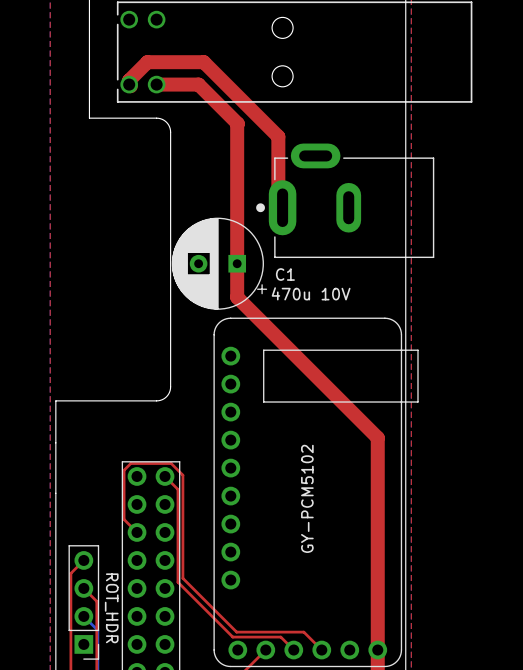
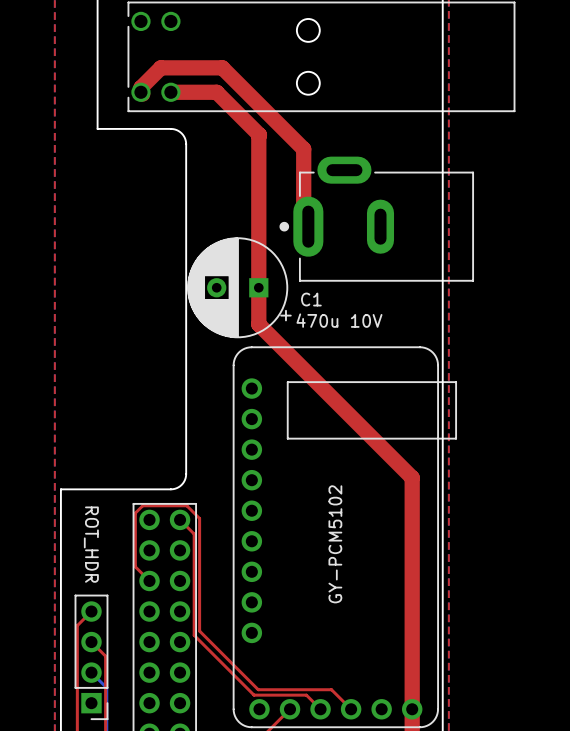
board edge: (170, 386) (166, 396) (158, 400) (55, 400) (55, 448) -> (186, 422) (186, 476) (184, 481) (178, 487) (170, 489) (60, 489)
part value position: ROT_HDR (111, 608) -> ROT_HDR (91, 544)

